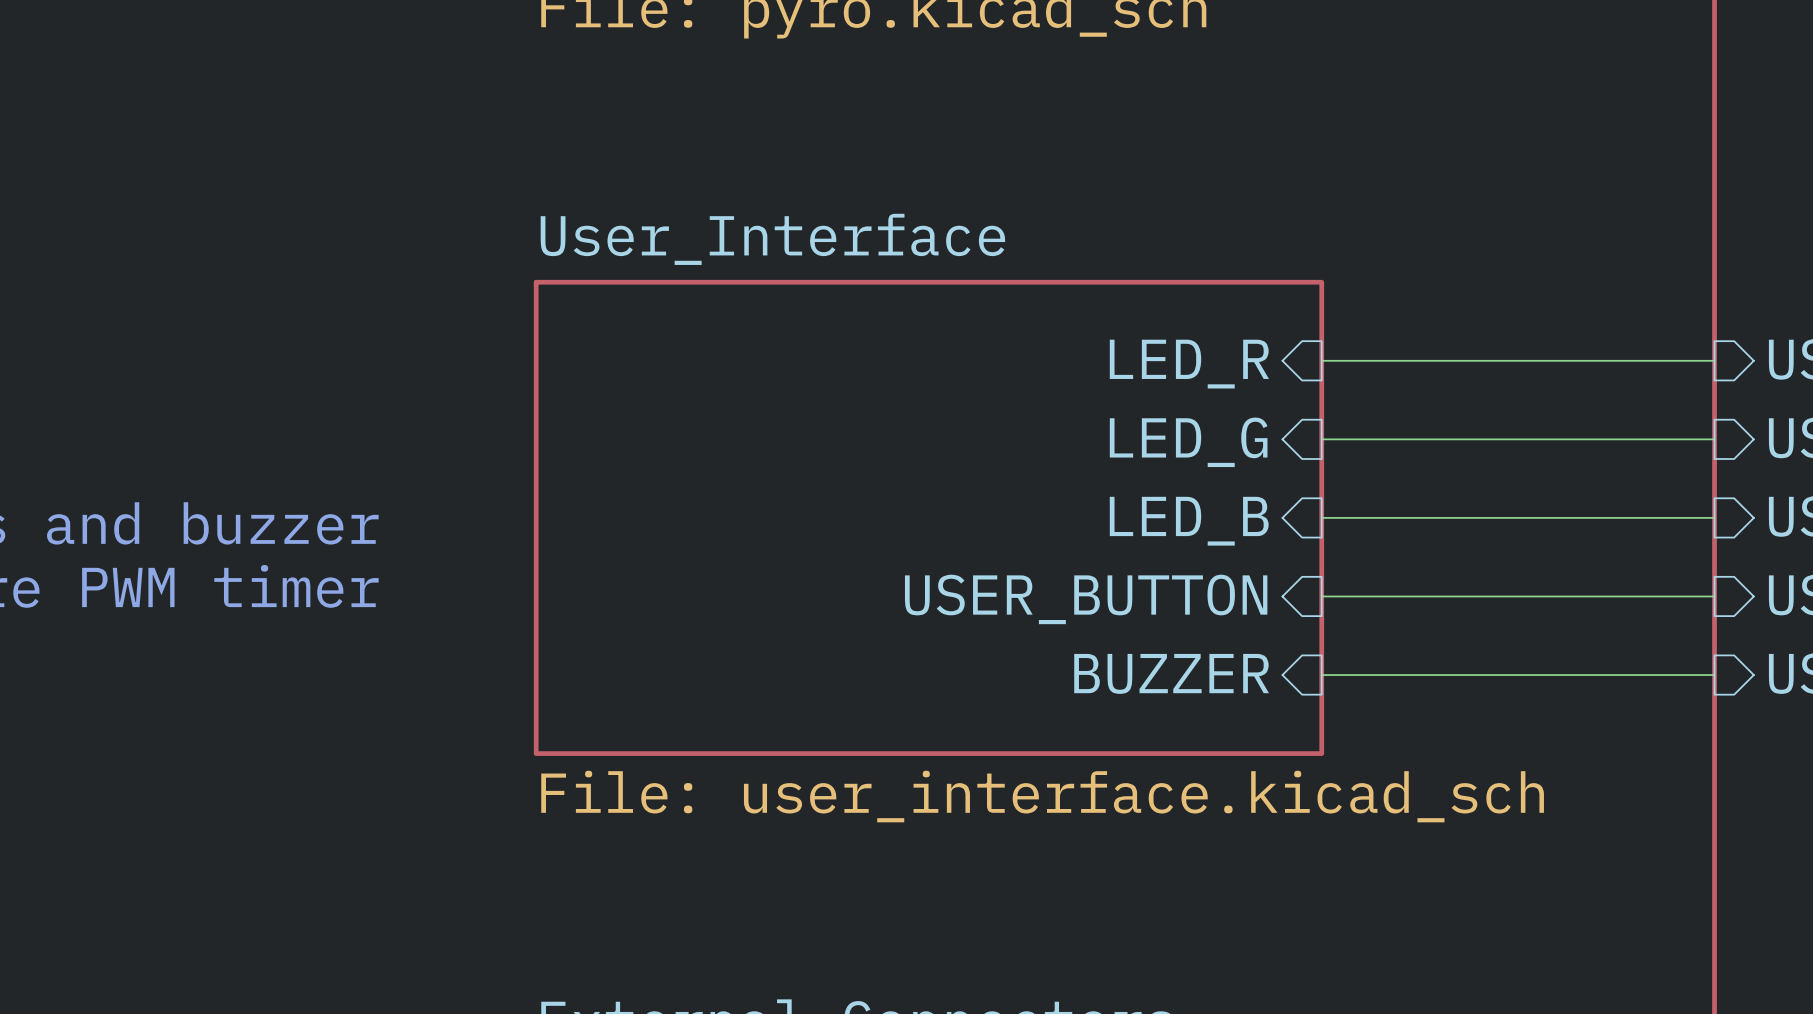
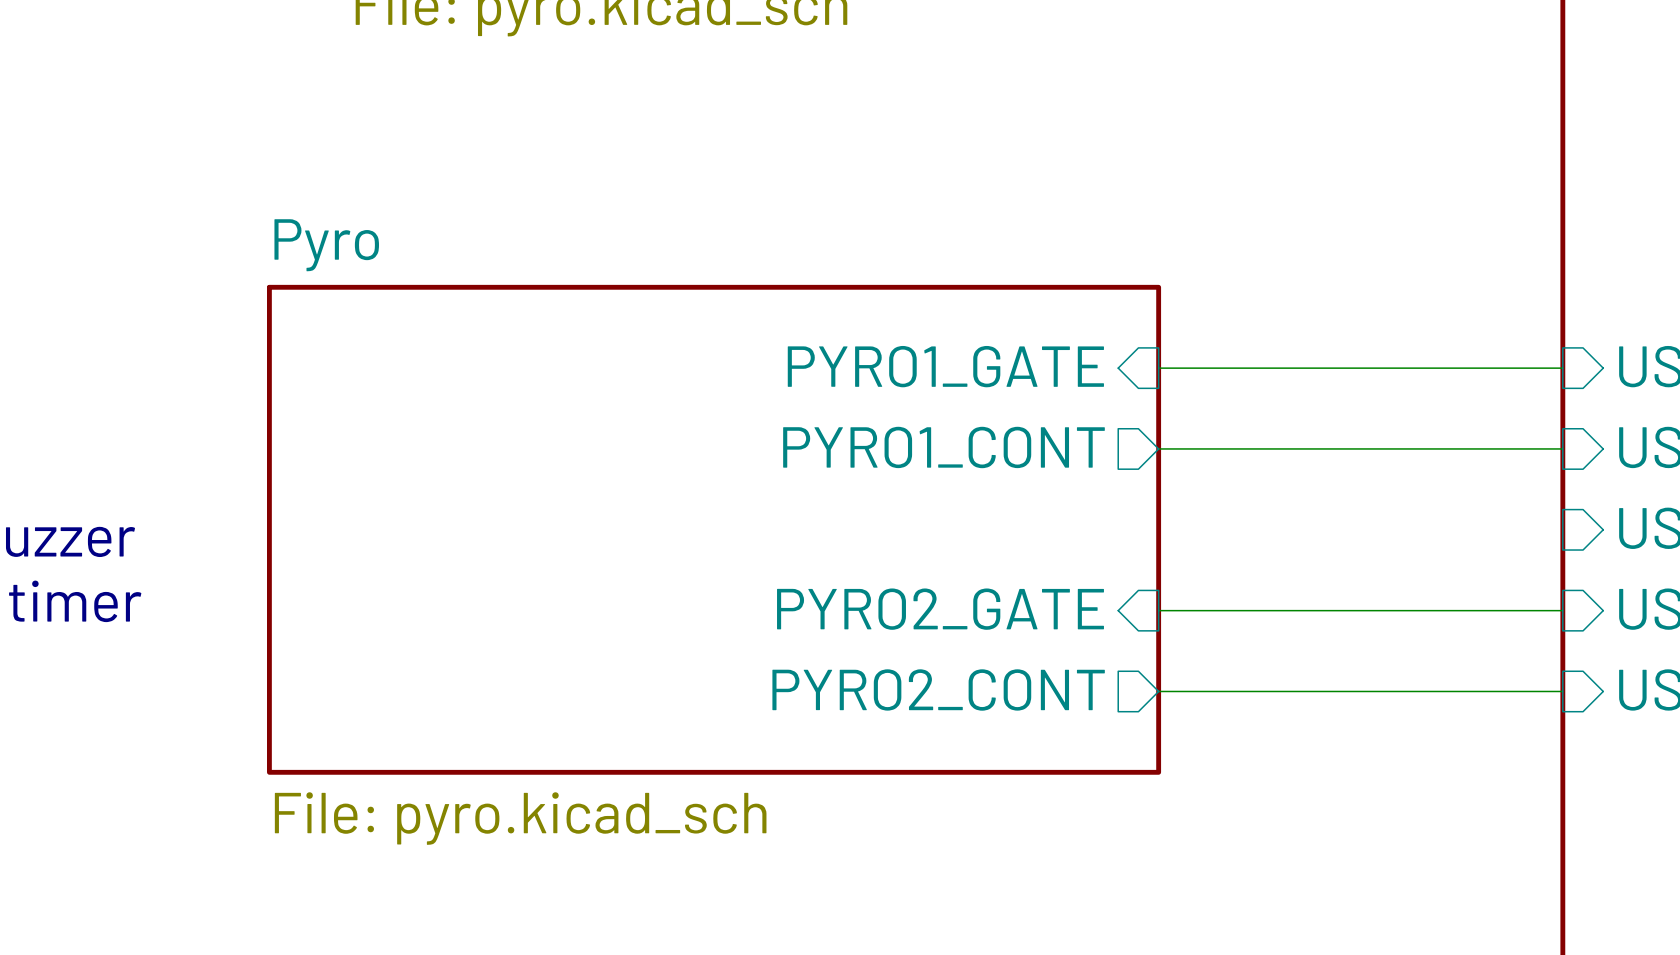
sheet pin: LED_R (1189, 364) -> PYRO1_GATE (945, 366)
sheet pin shape: input (1188, 442) -> output (943, 447)
sheet pin: LED_G (1188, 442) -> PYRO1_CONT (943, 447)
sheet Pyro: none -> File: pyro.kicad_sch (714, 529)
sheet User_Interface: File: user_interface.kicad_sch (928, 517) -> none
wire: (1321, 517) (1714, 517) -> none
sheet pin: LED_B (1189, 521) -> none
sheet pin: USER_BUTTON (1086, 599) -> PYRO2_GATE (940, 609)
sheet pin shape: input (1171, 673) -> output (938, 690)
sheet pin: BUZZER (1171, 673) -> PYRO2_CONT (938, 690)

